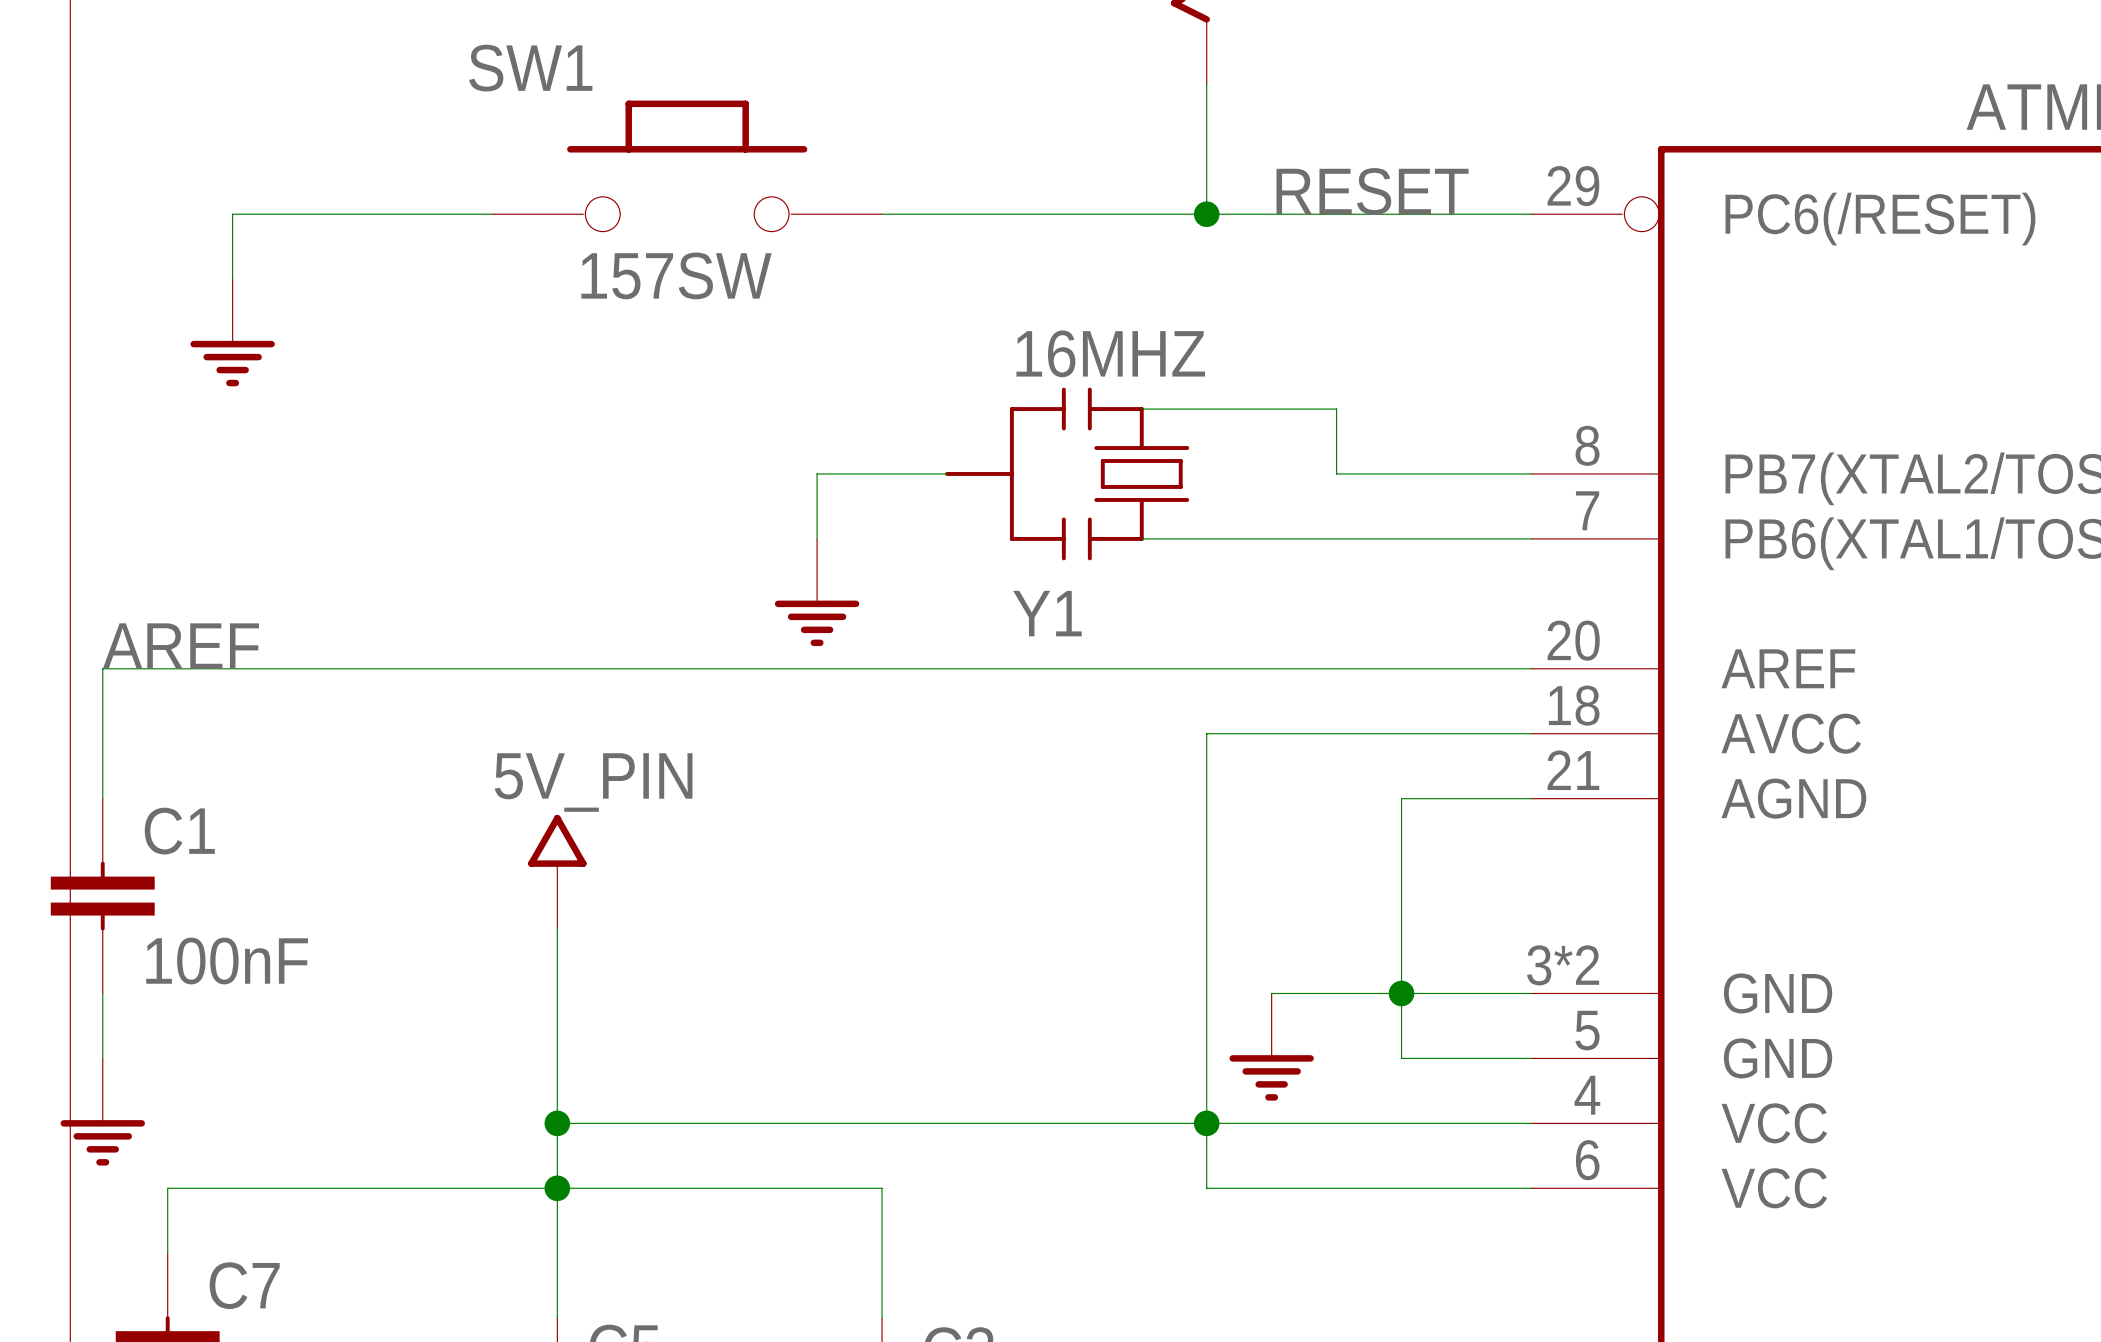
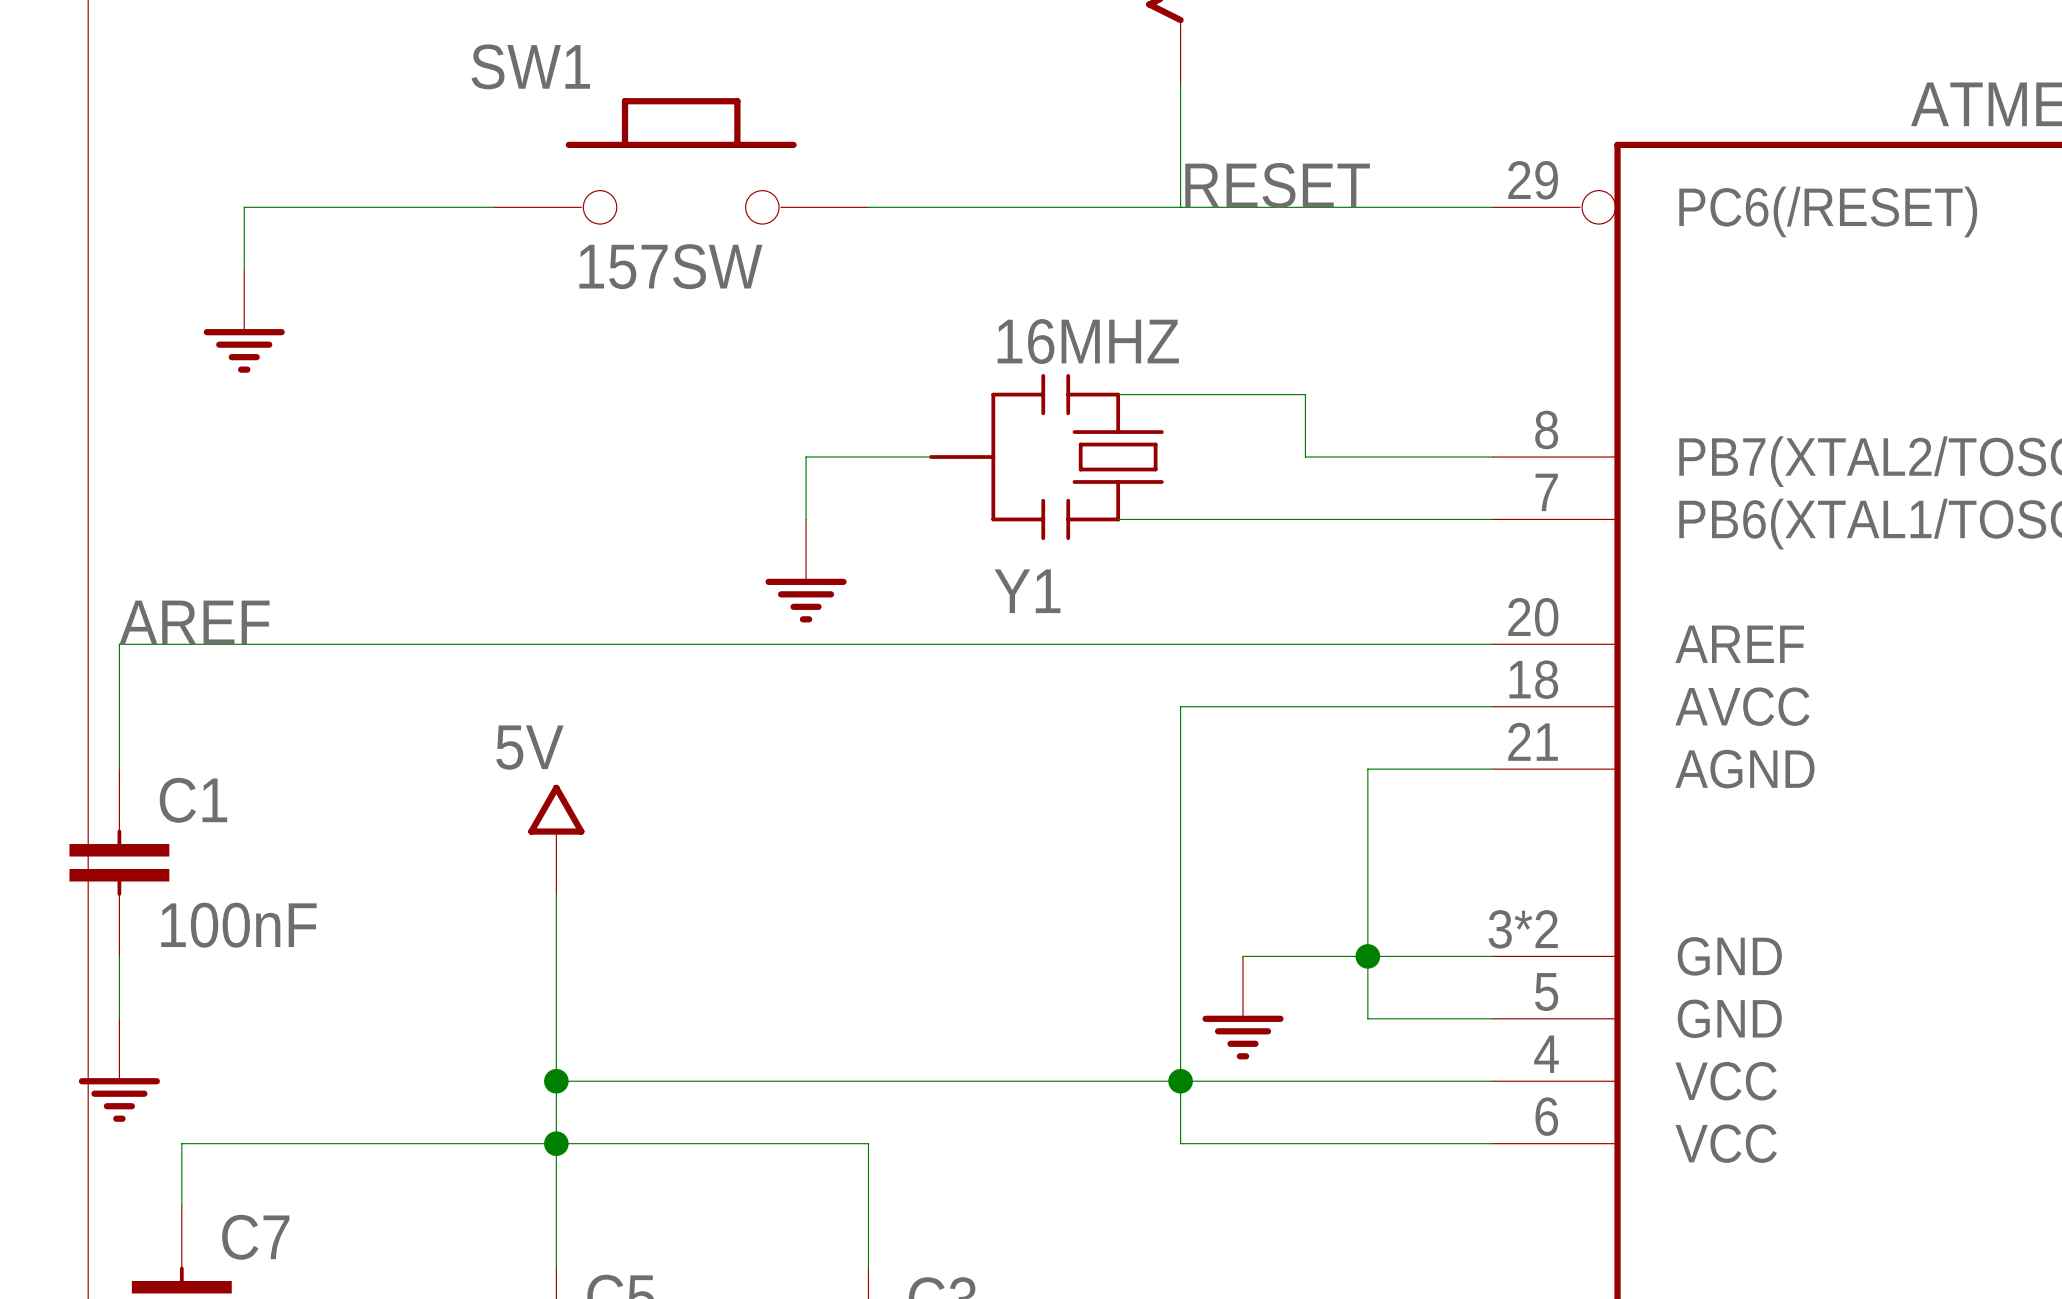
label position: RESET (1372, 191) -> RESET (1277, 185)
junction: (1206, 214) -> none
power symbol: 5V_PIN (557, 871) -> 5V (556, 839)

